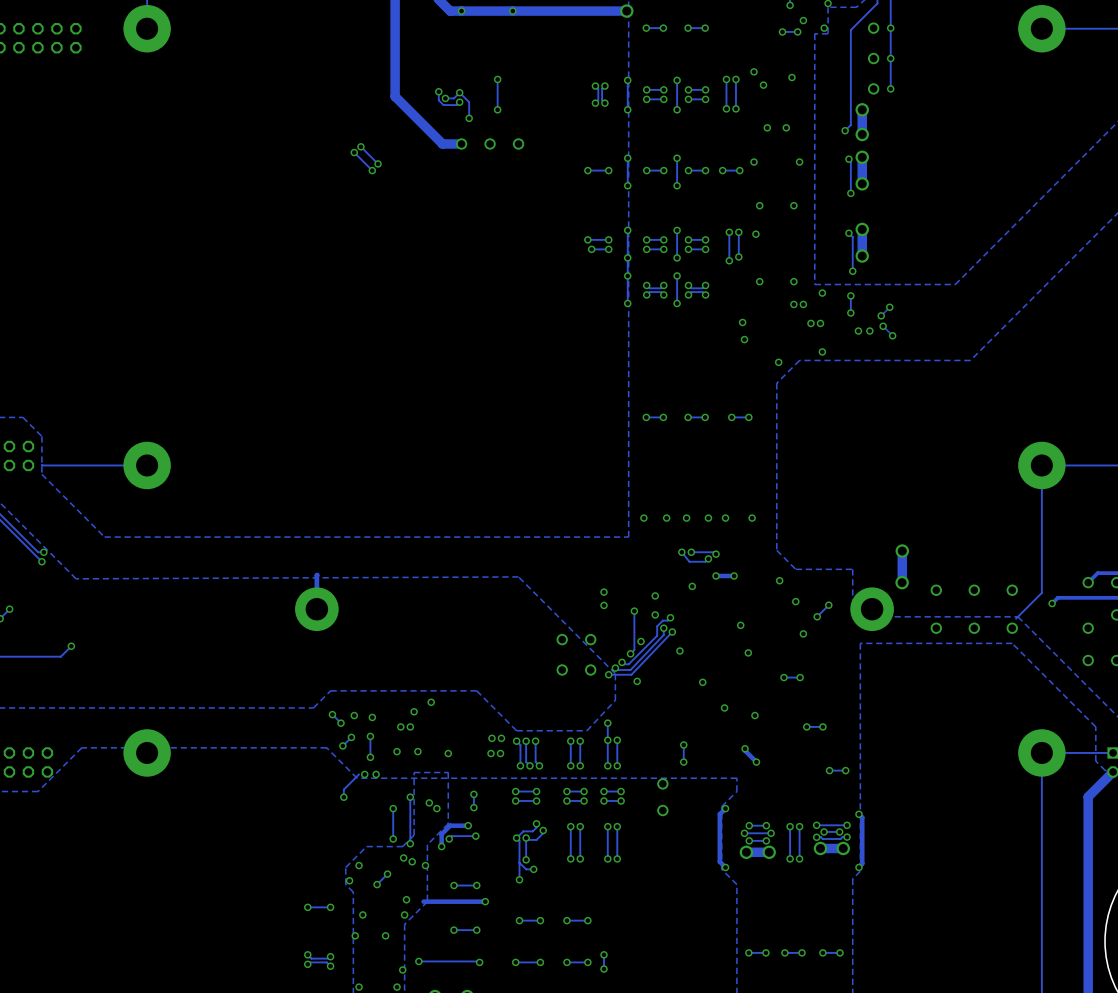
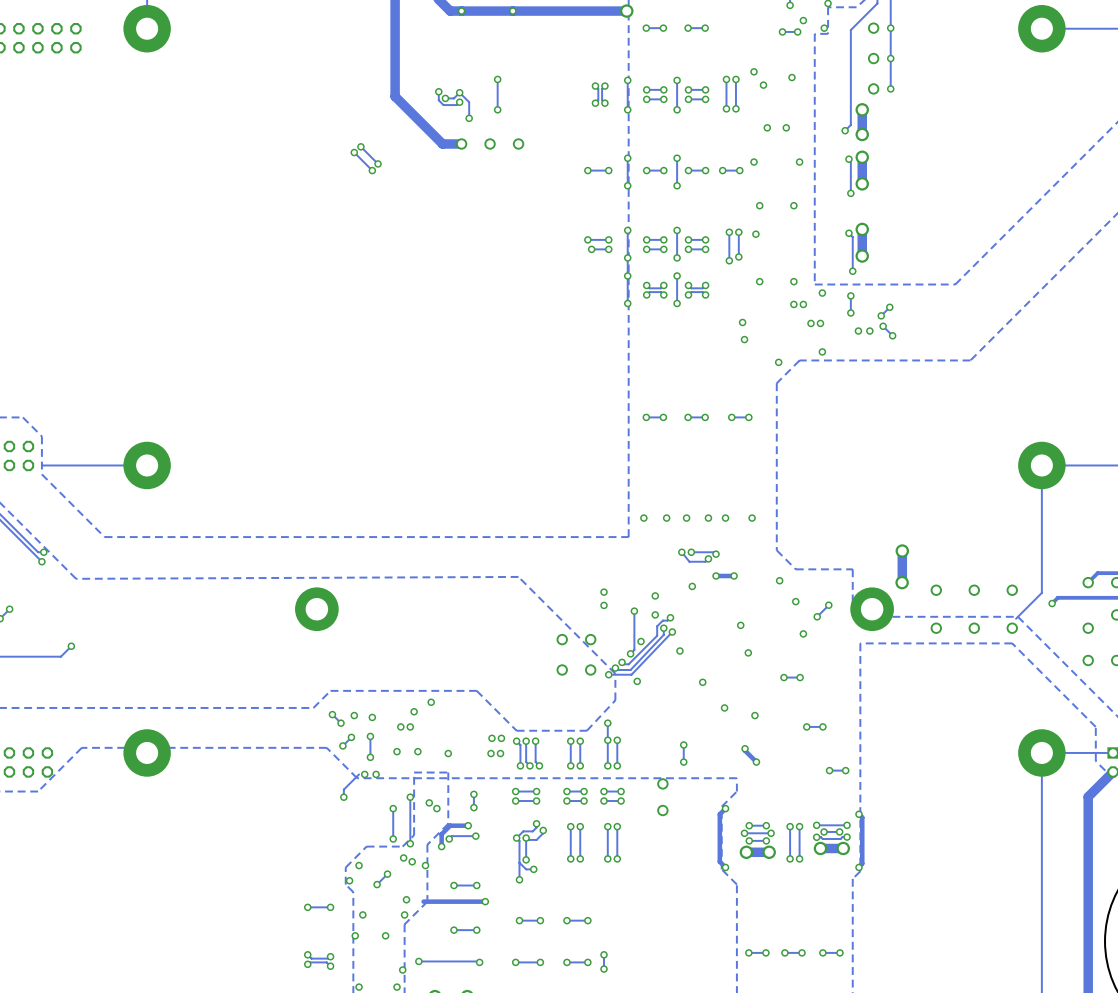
track: (317, 575) (316, 609) -> none

